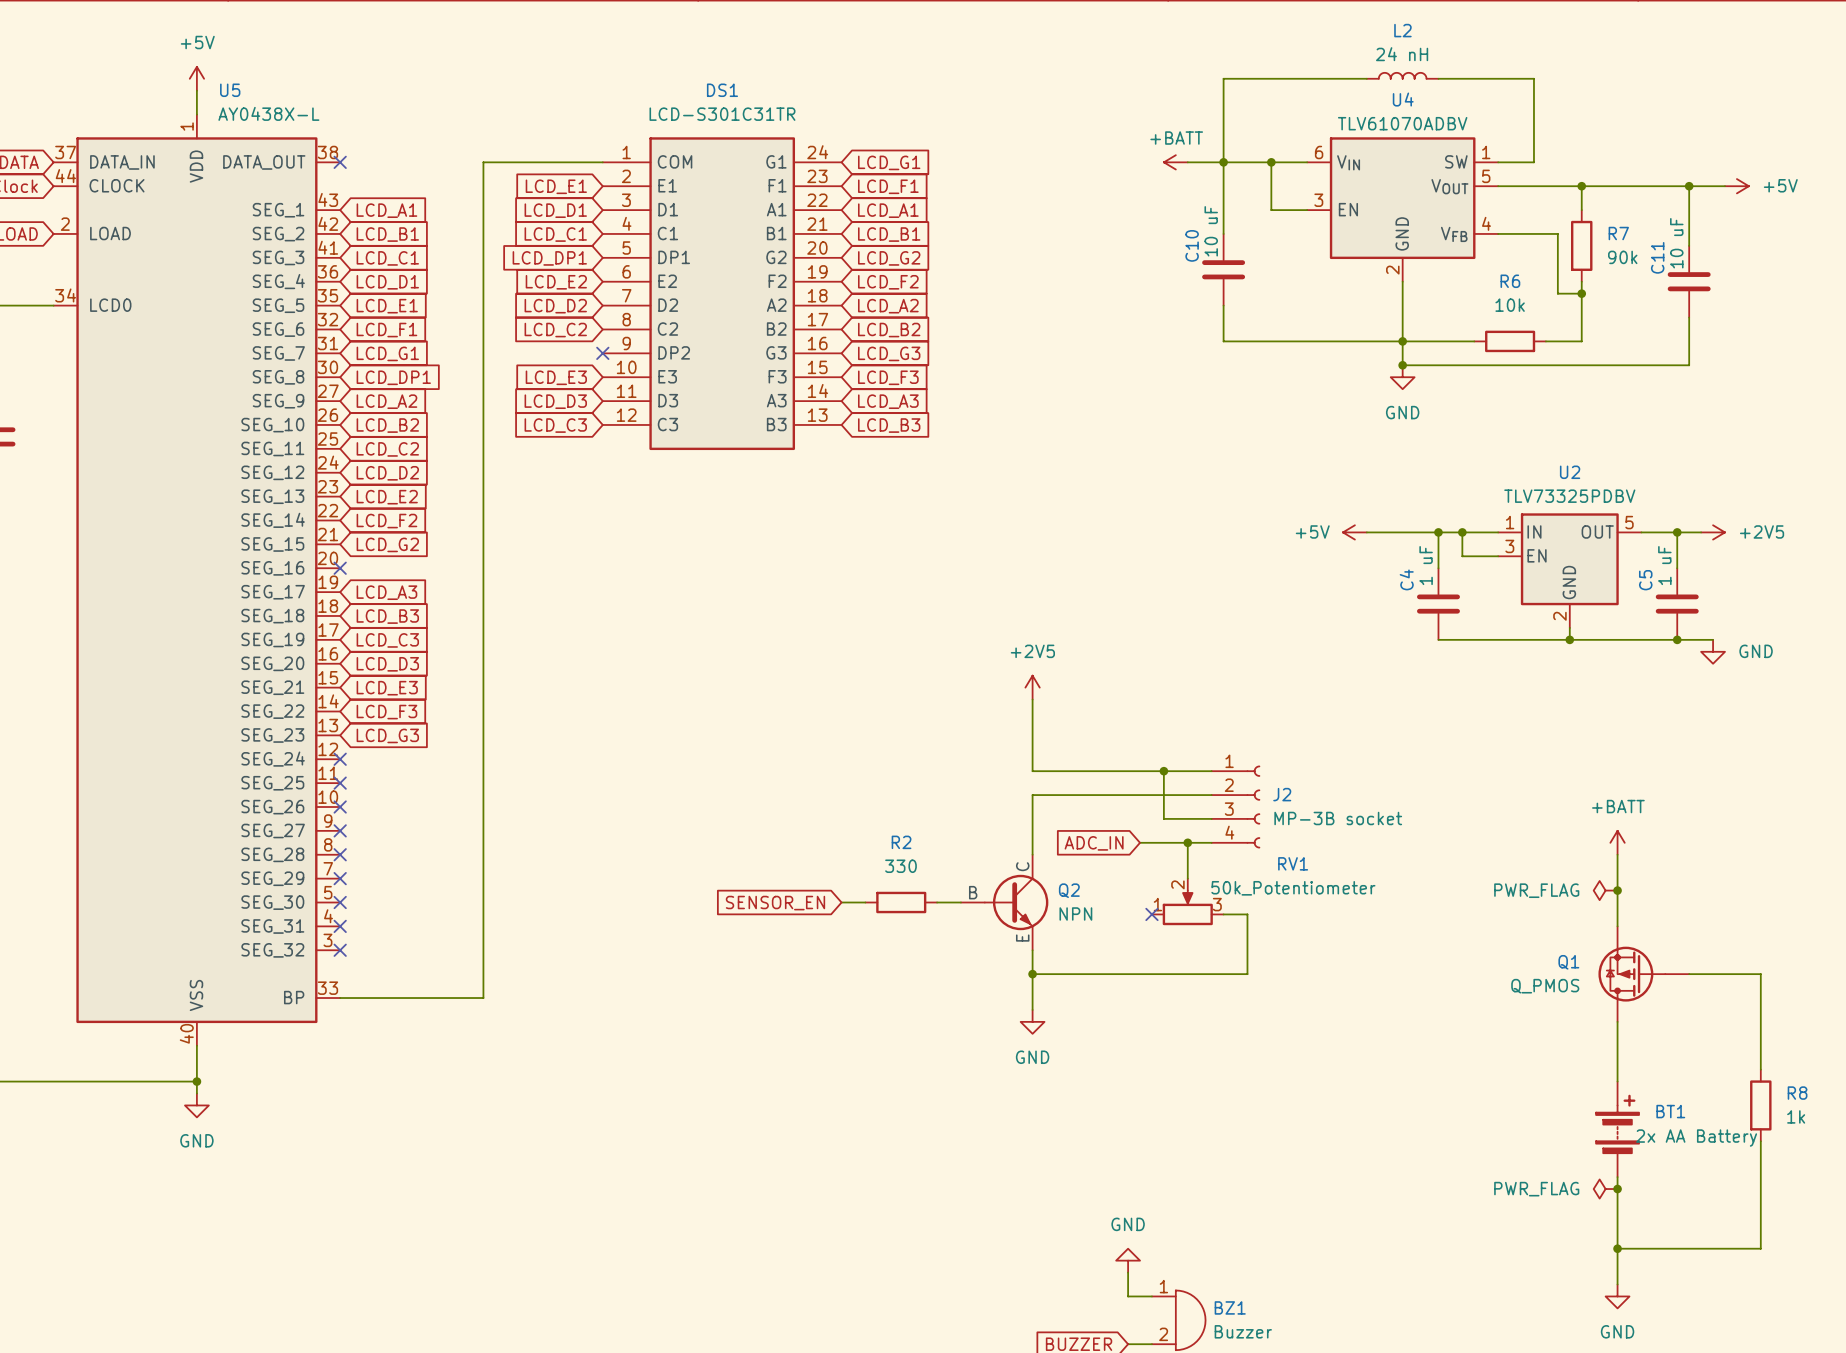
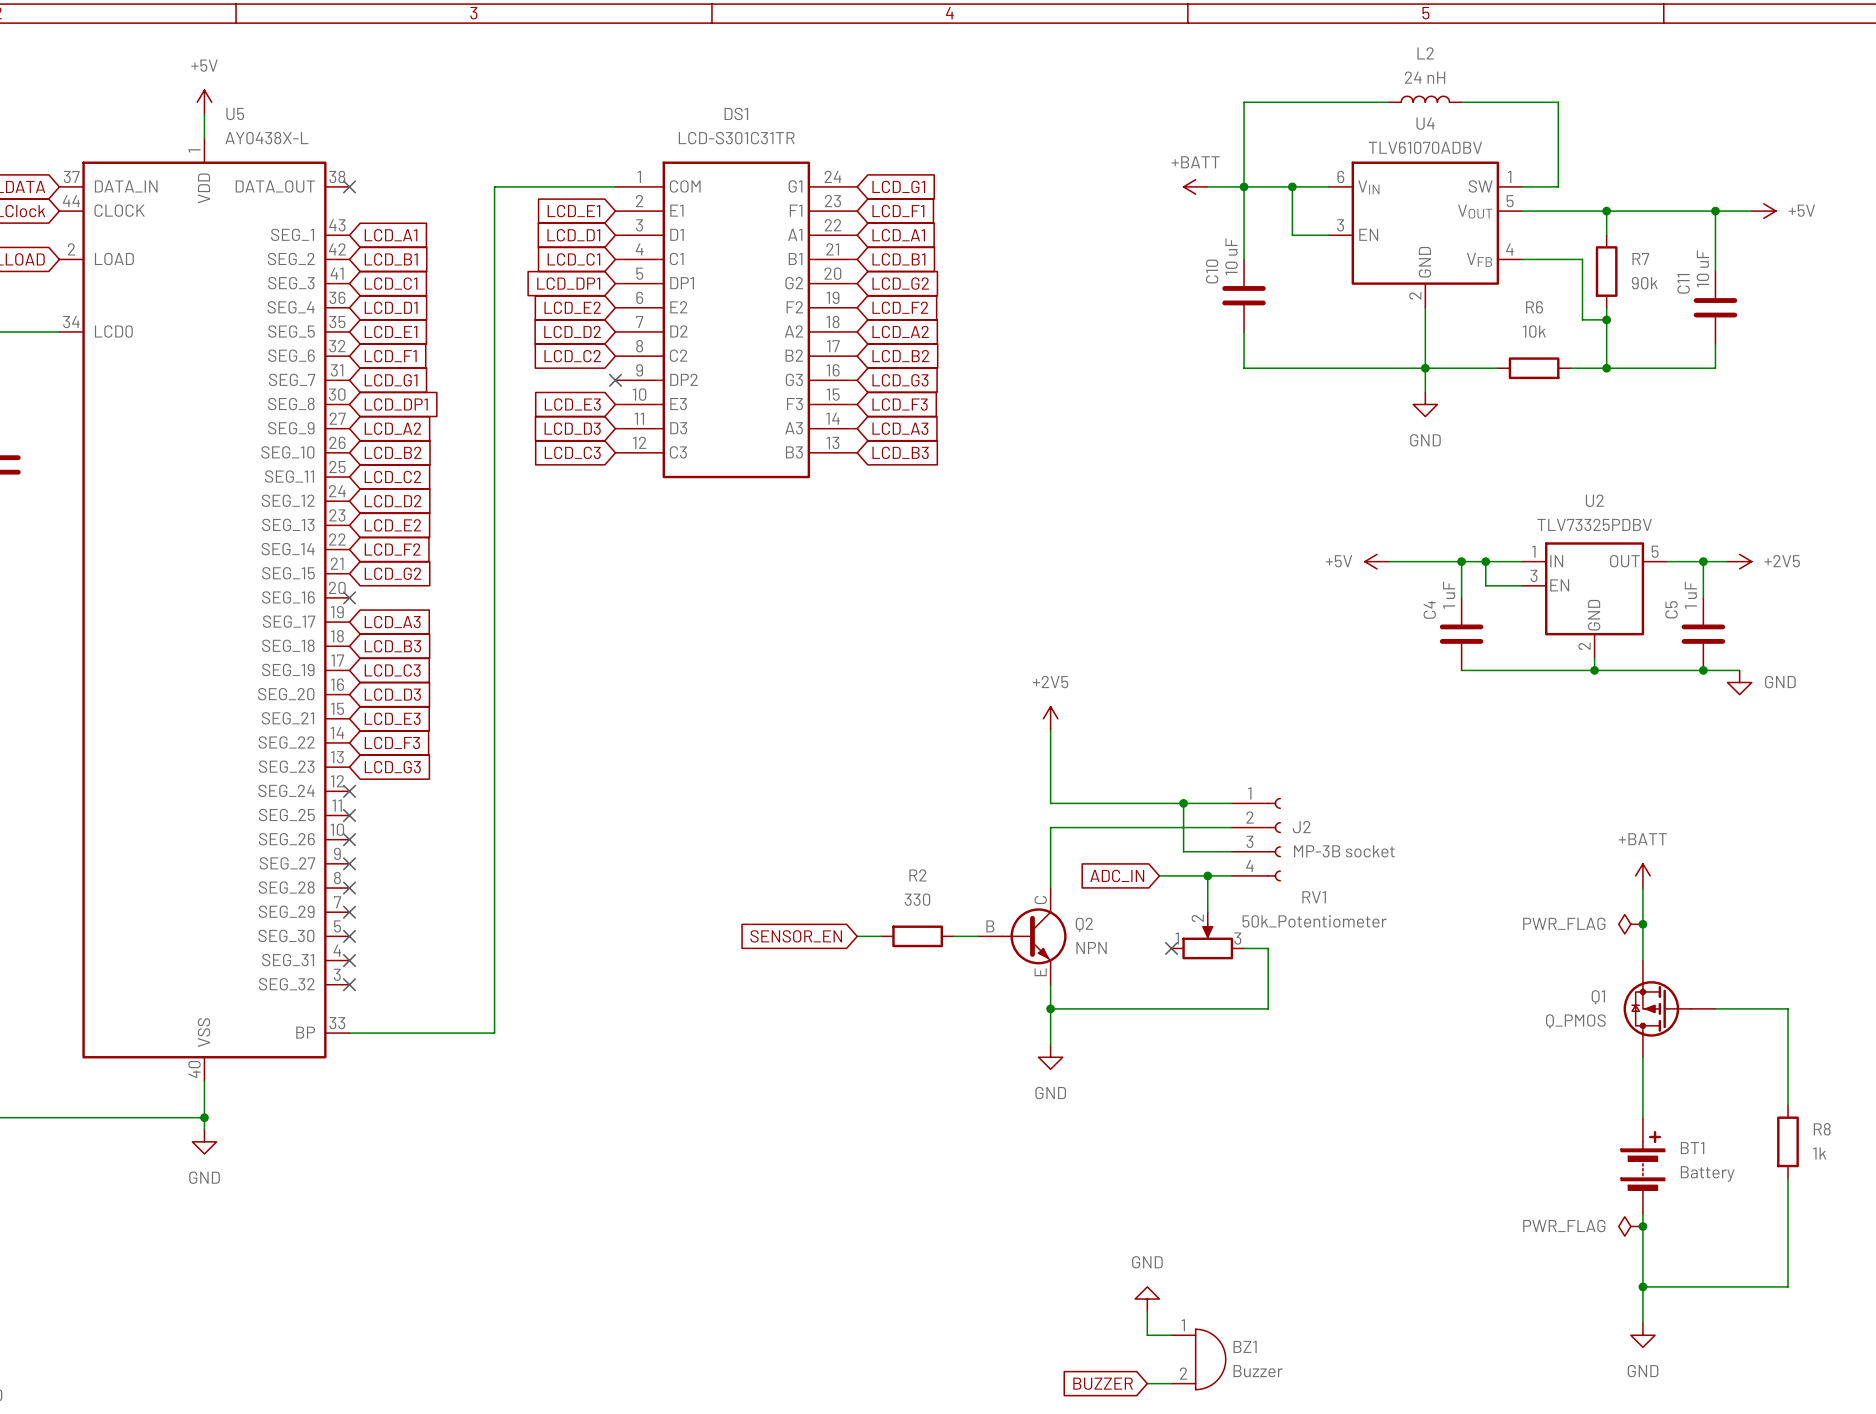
junction: none -> (1606, 368)
wire: (1689, 341) (1689, 365) (1402, 365) -> (1715, 368) (1606, 368)
junction: (1402, 365) -> none
BT1 value: 2x AA Battery (1696, 1138) -> Battery (1707, 1173)

